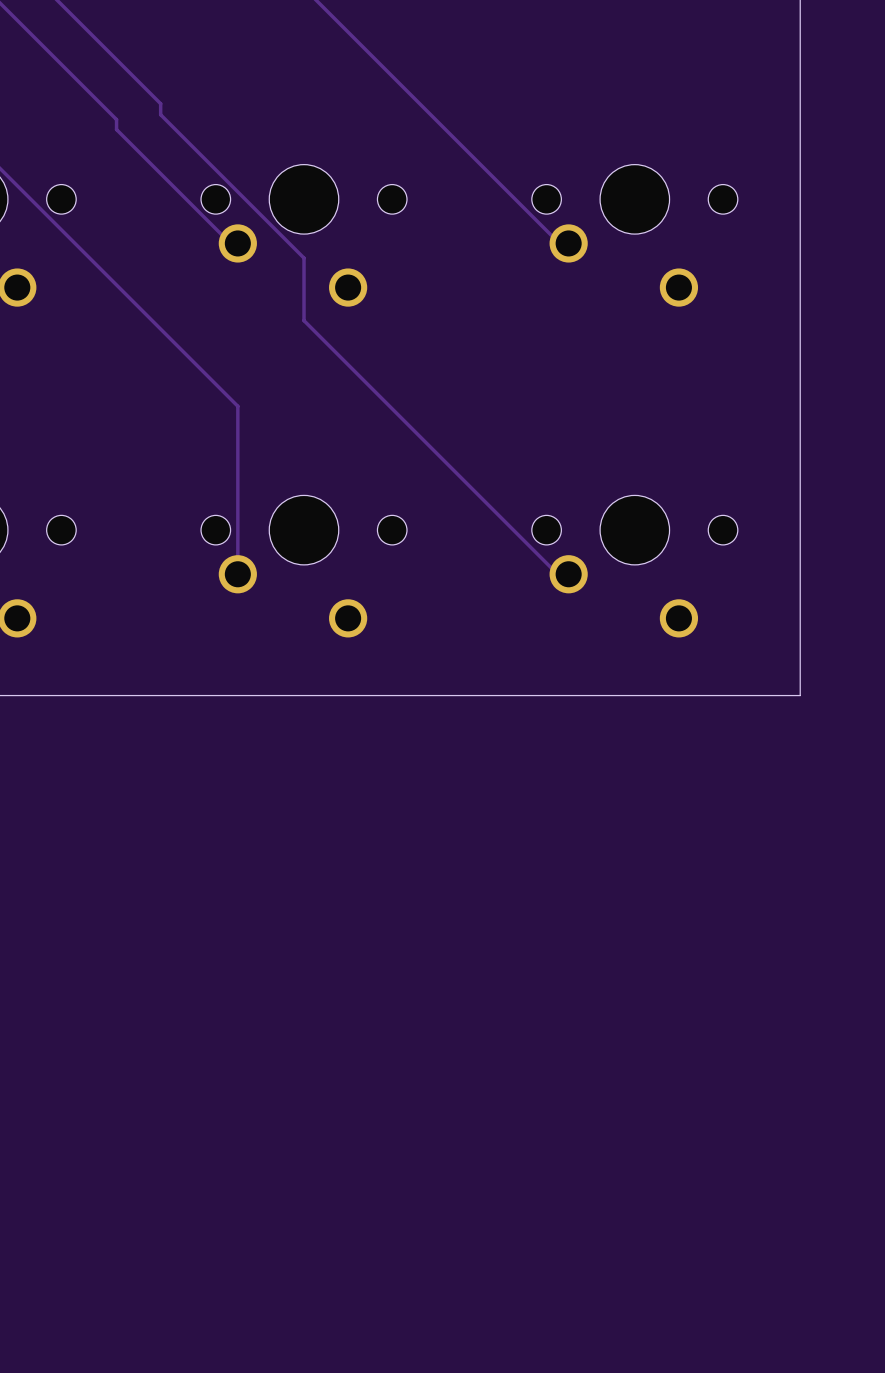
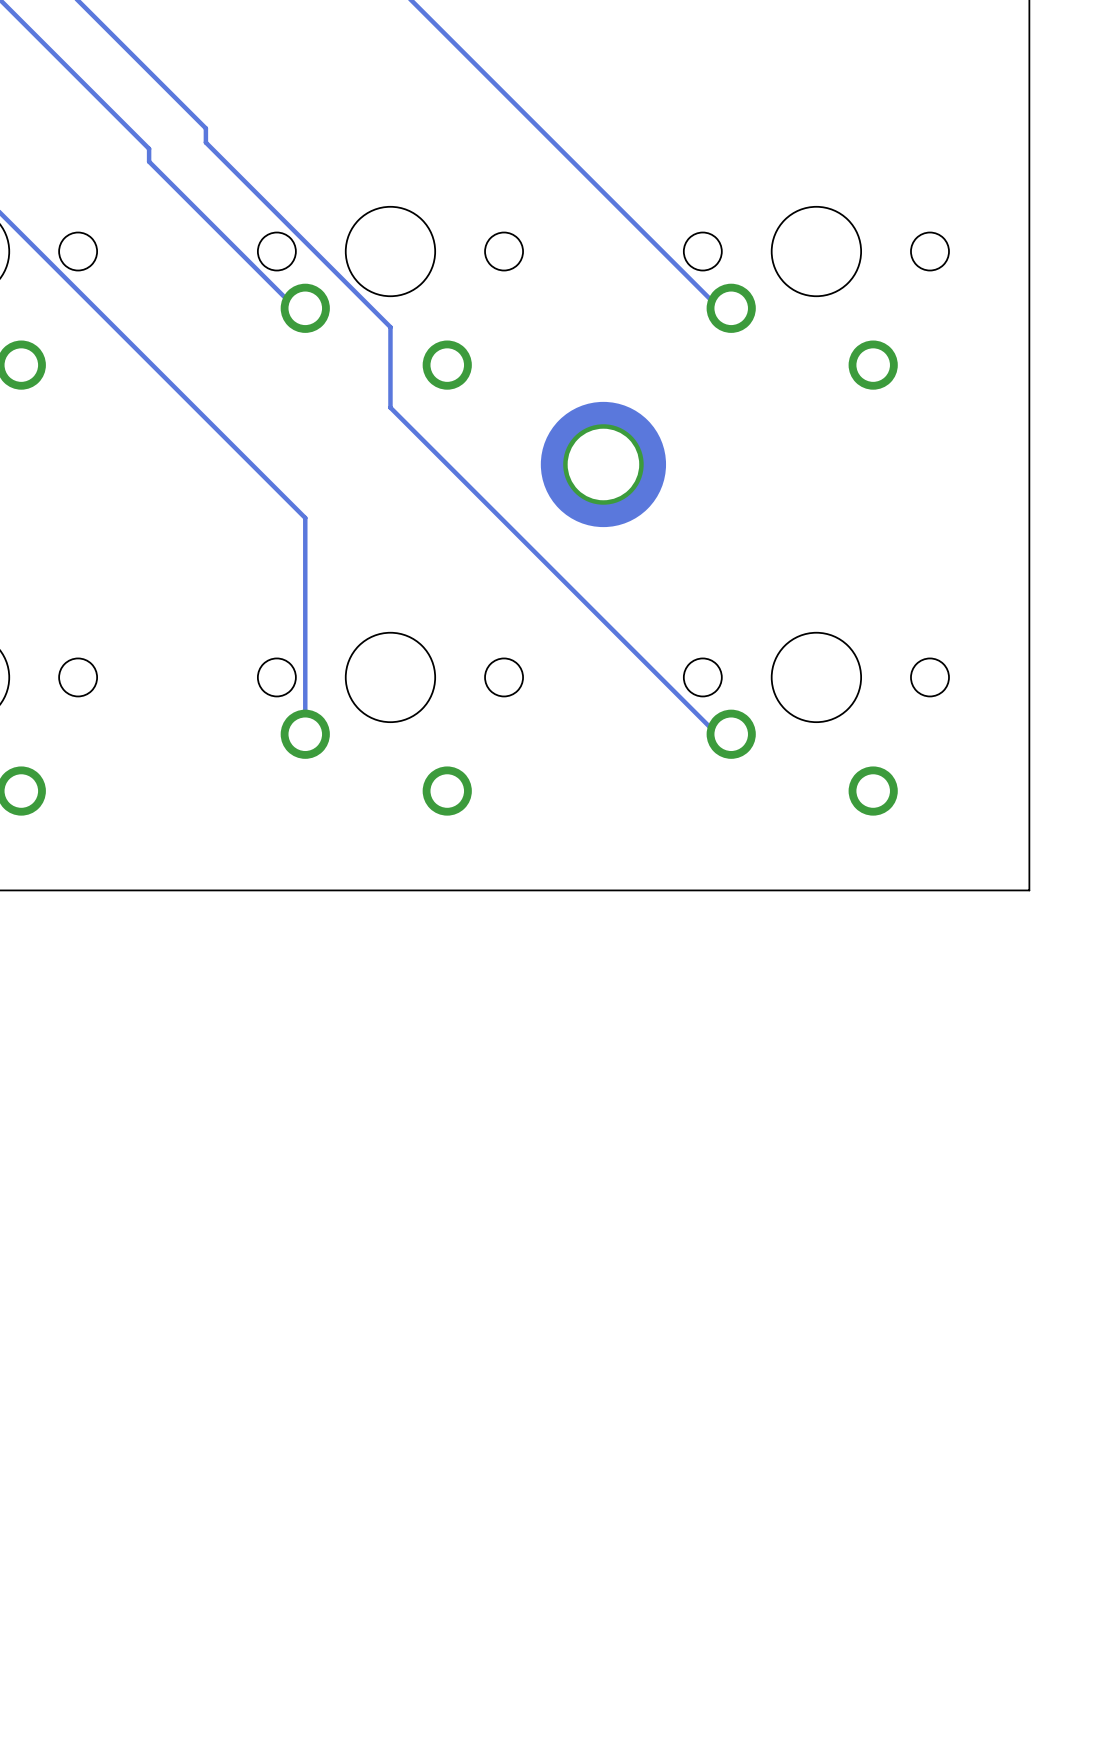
part: none -> (603, 464)

